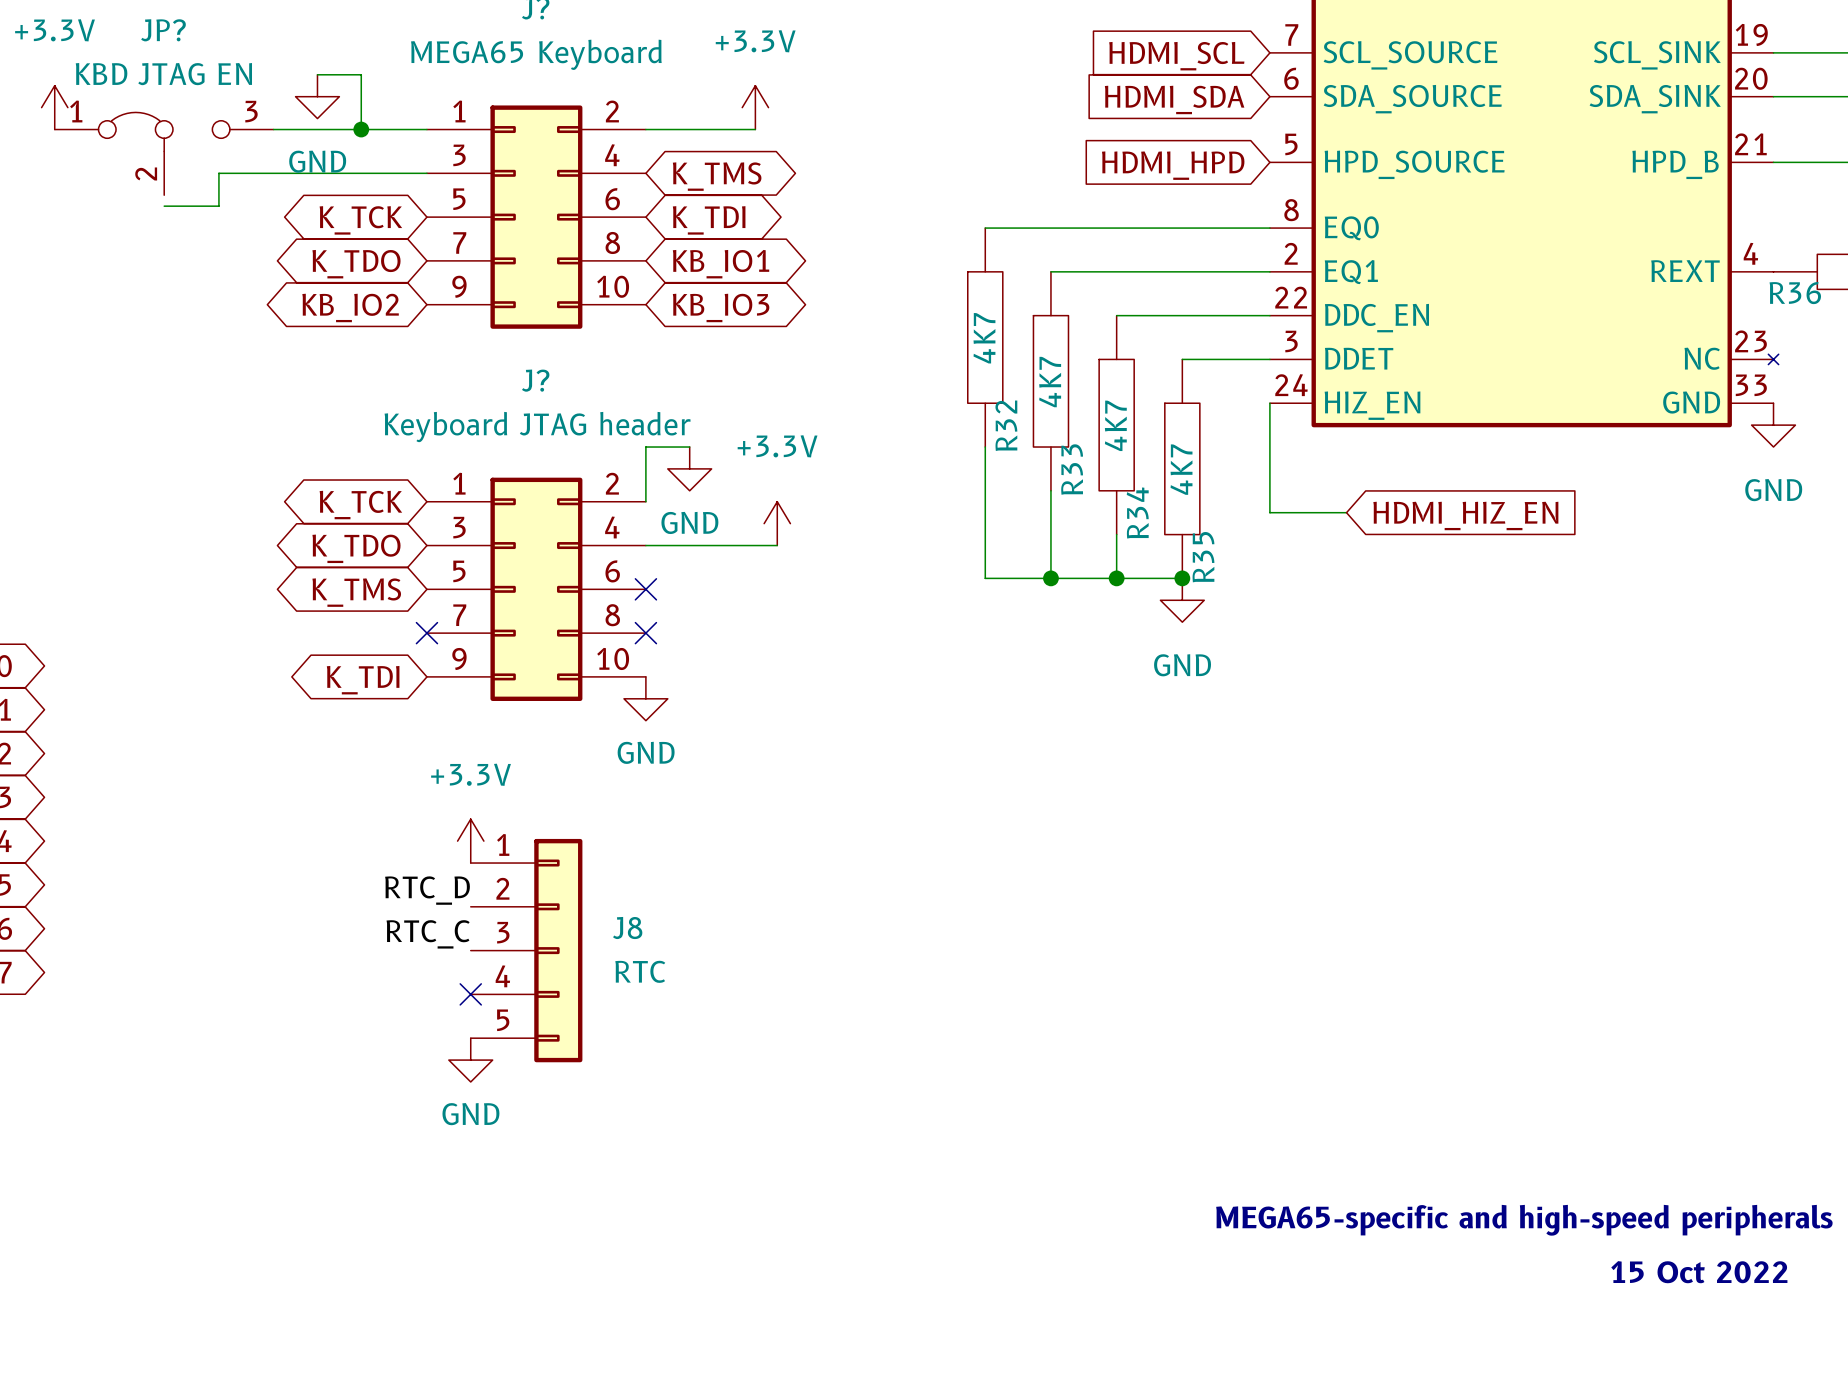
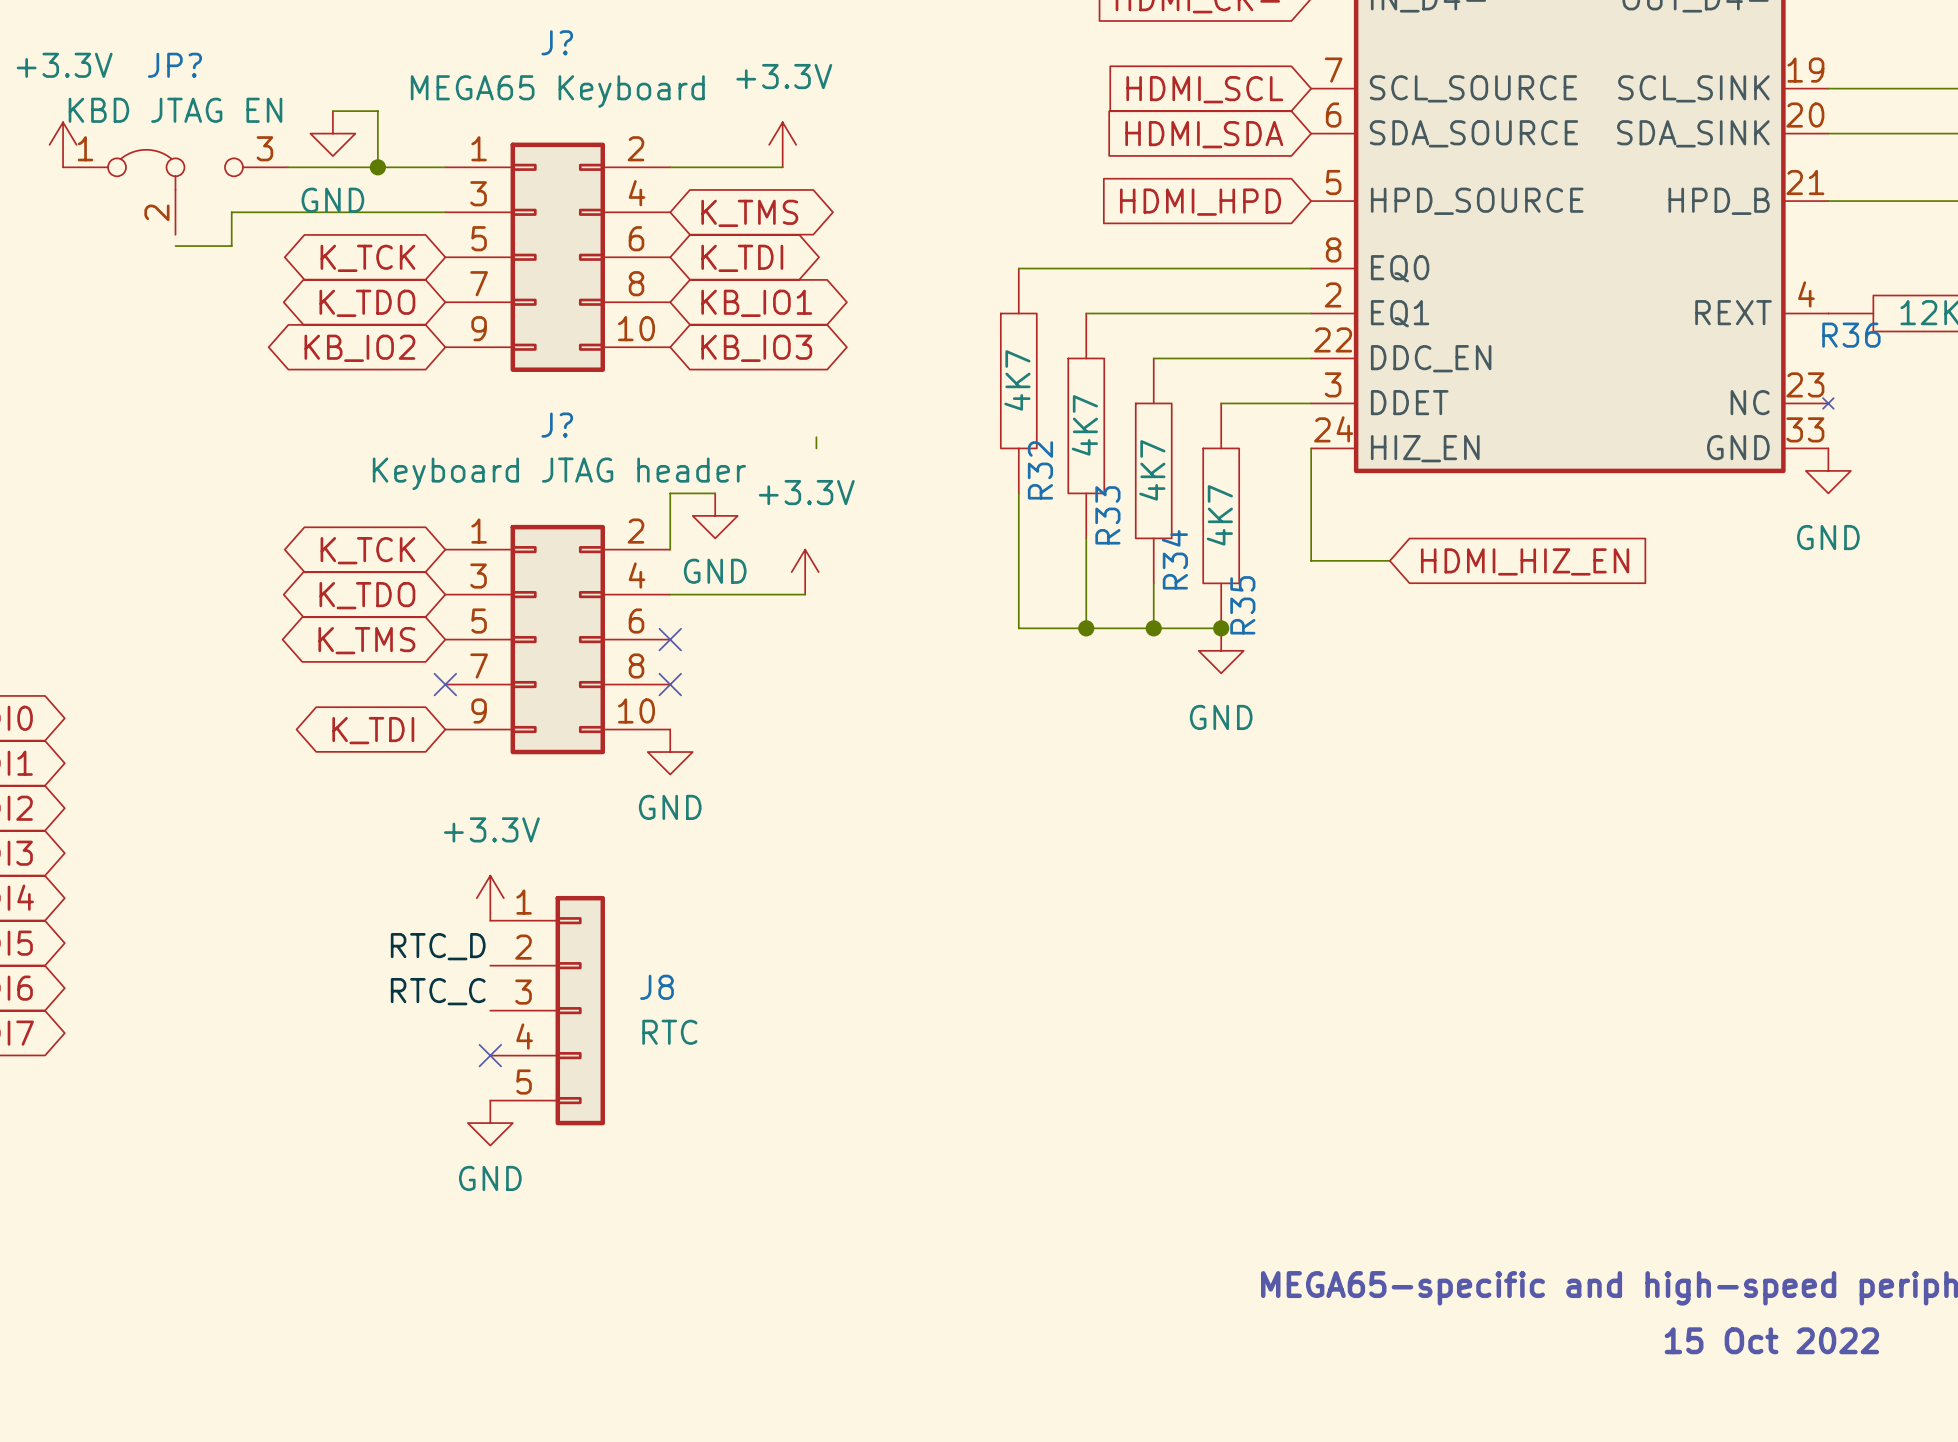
wire: none -> (816, 437) (816, 448)

